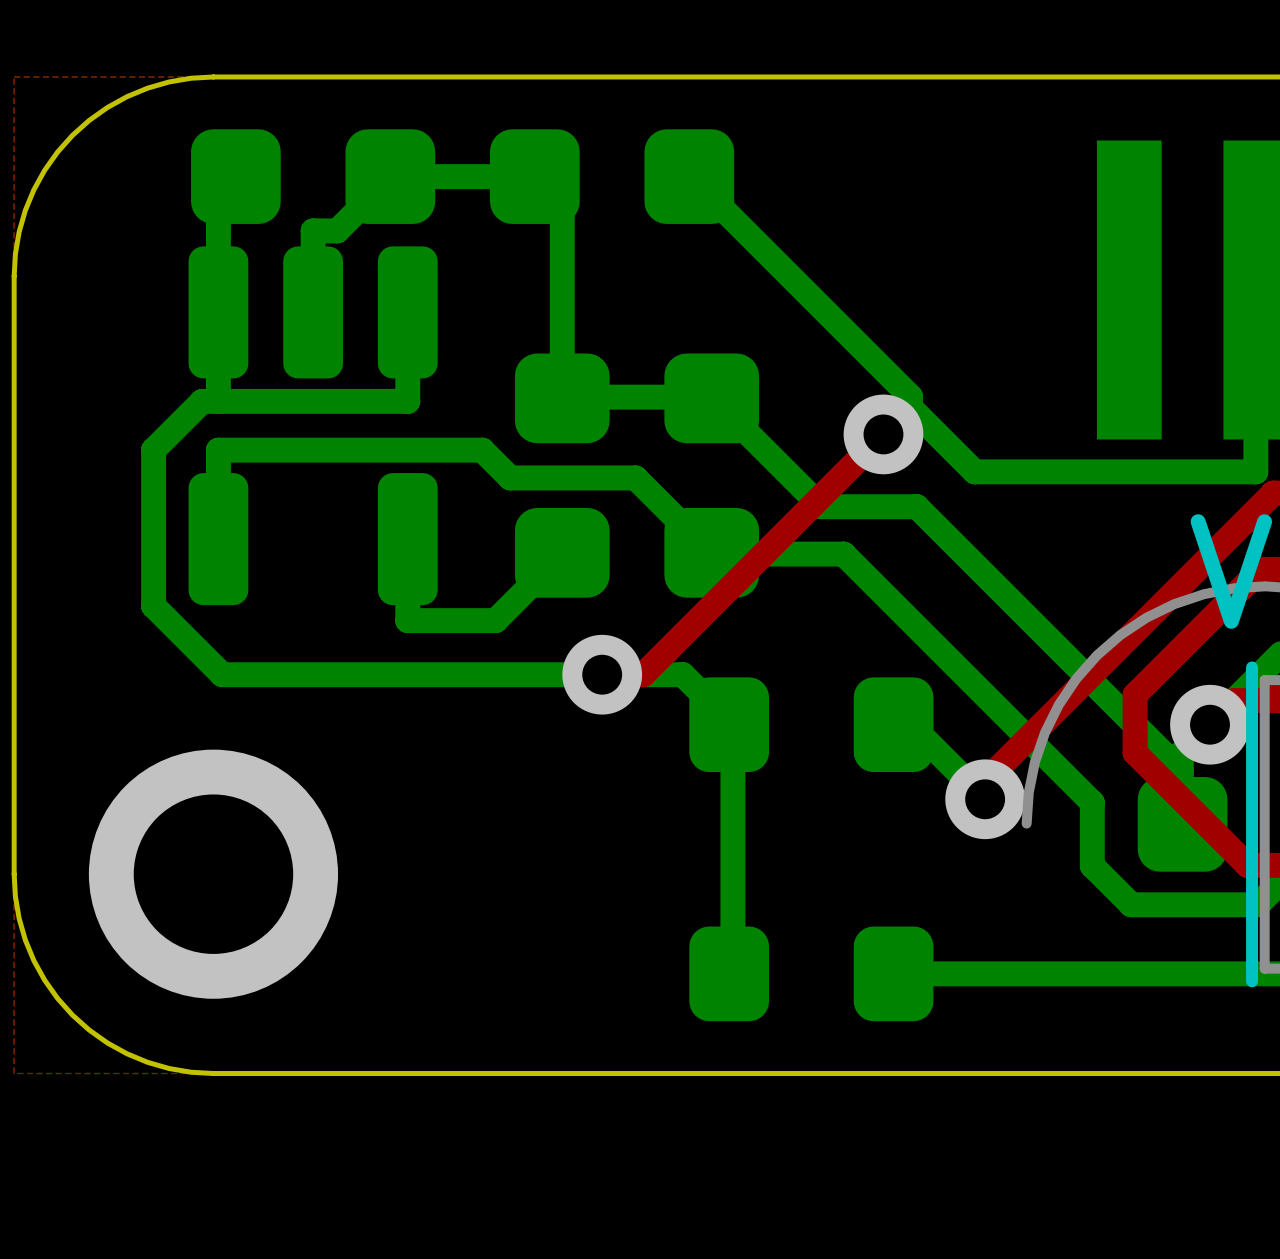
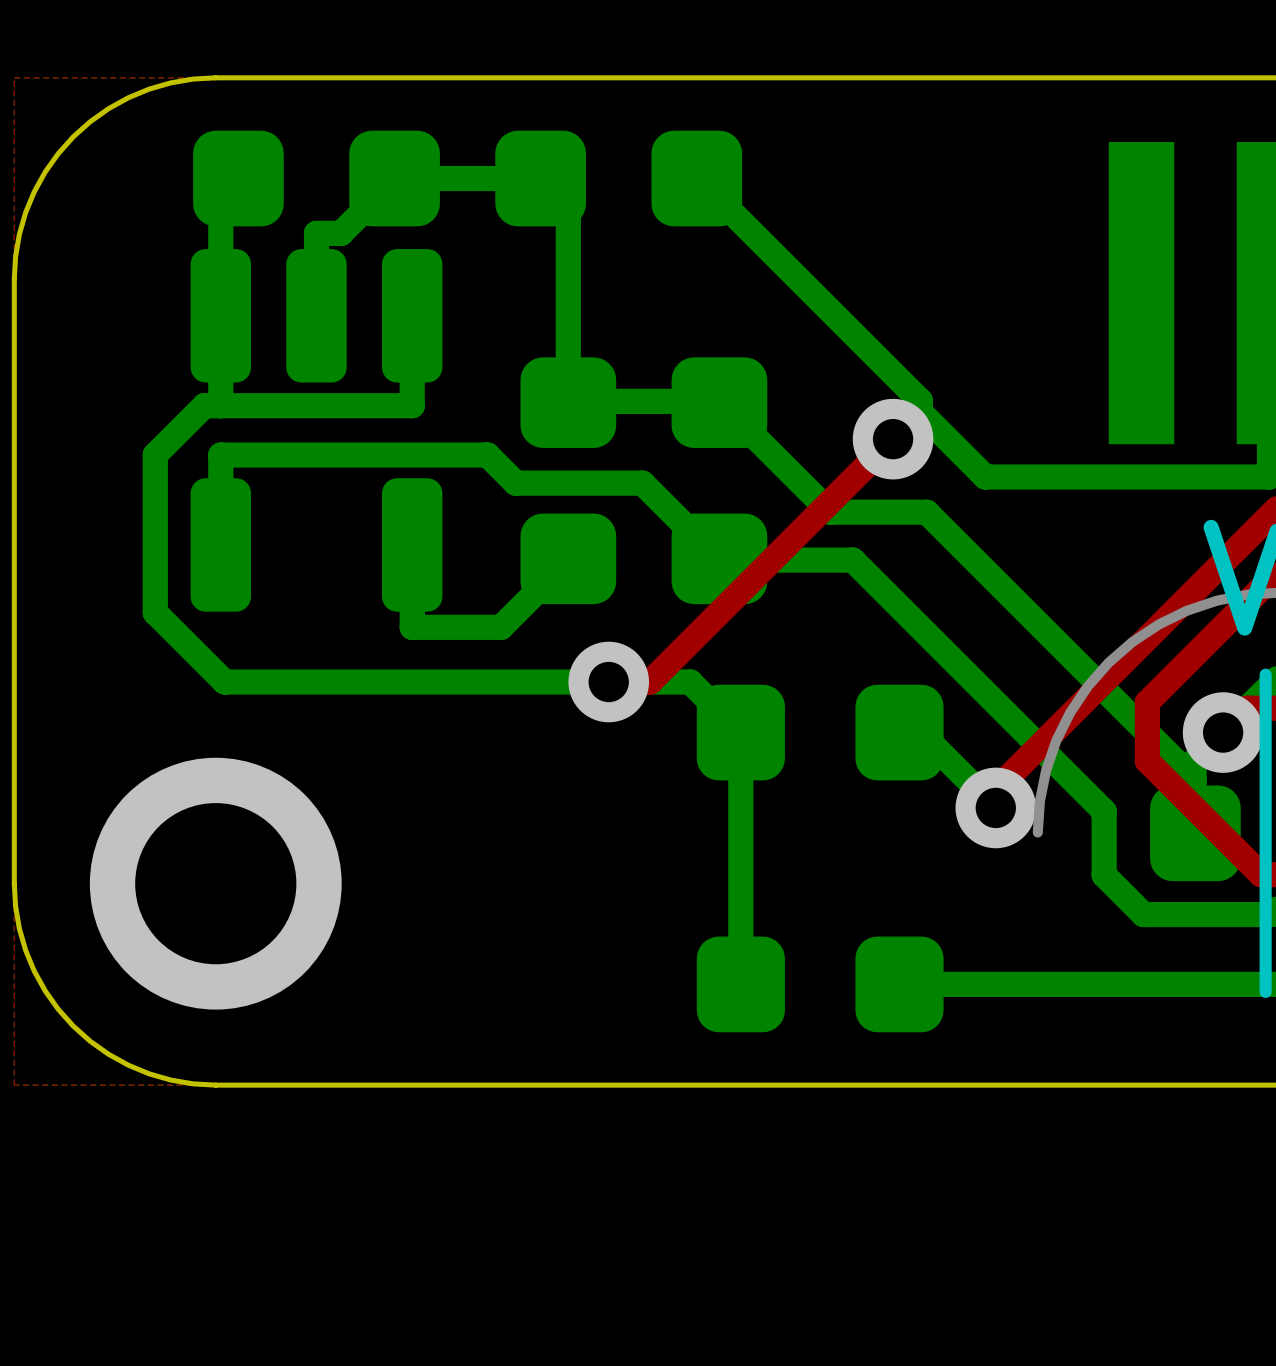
part footprint: [689, 677, 934, 773] -> [696, 684, 944, 781]
part footprint: [689, 926, 934, 1022] -> [696, 936, 944, 1033]

